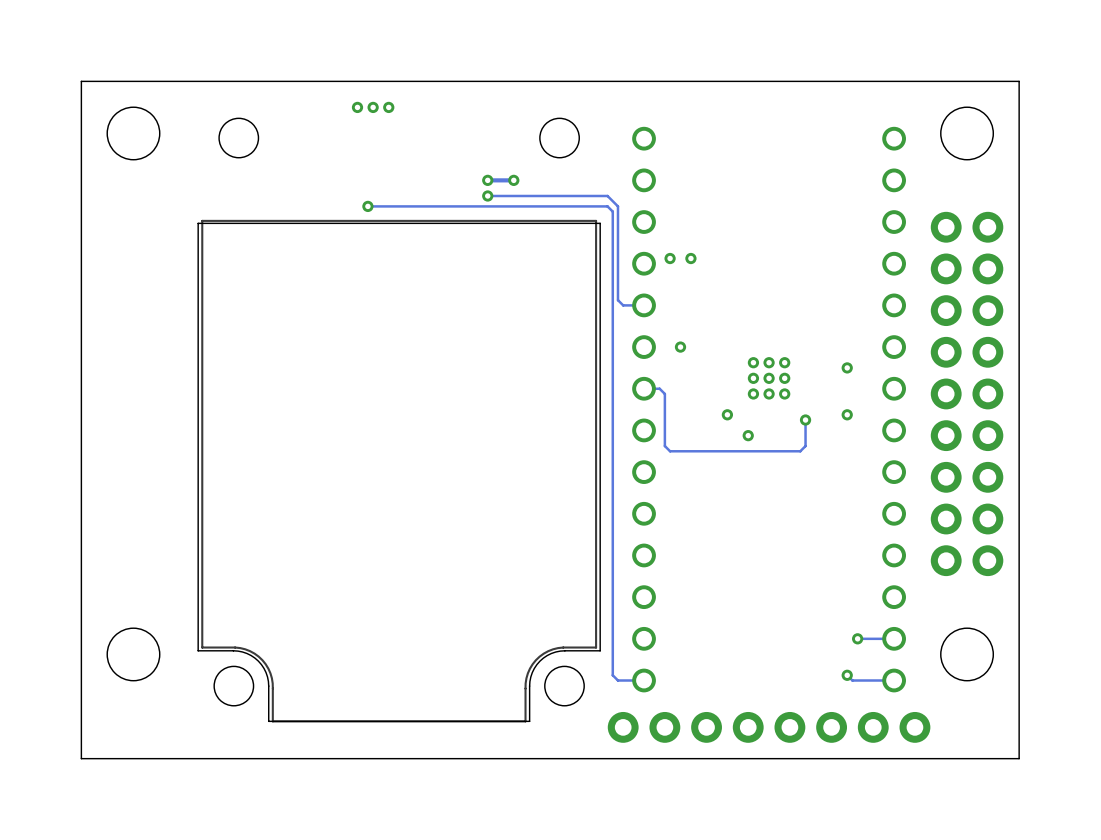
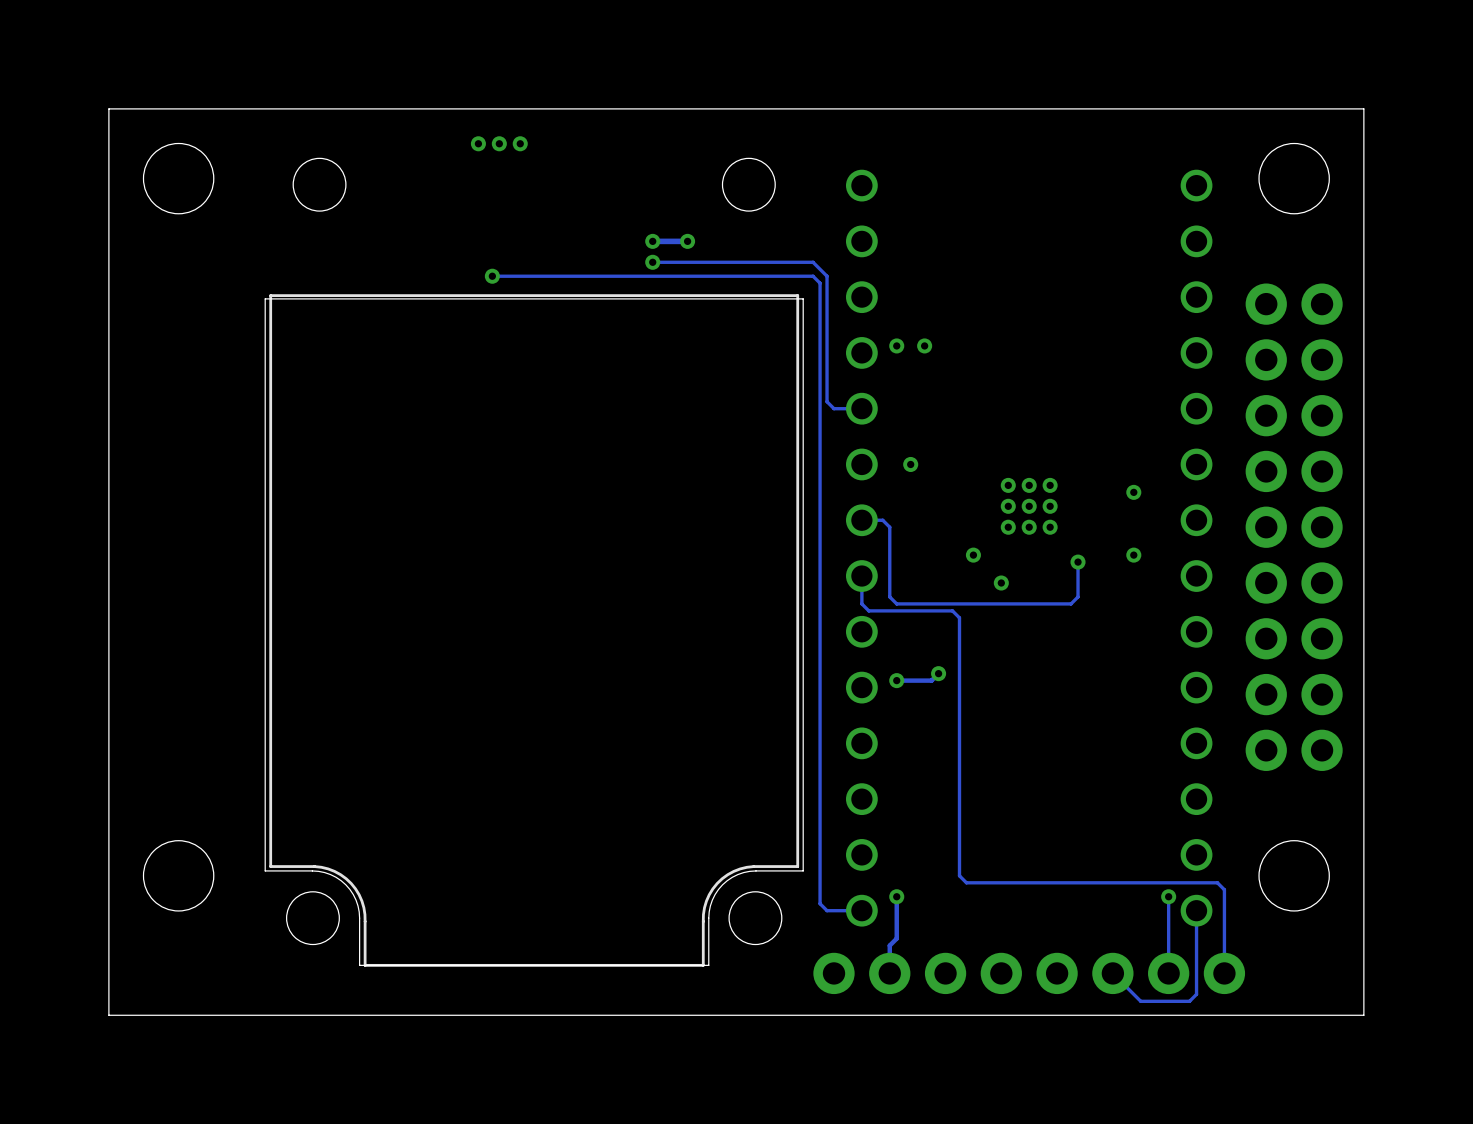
track: none -> (861, 576) (861, 603) (868, 610) (952, 610) (959, 617) (959, 875) (966, 882) (1217, 882) (1224, 889) (1224, 973)
track: none -> (938, 673) (931, 680) (896, 680)
via: none -> (938, 673)
via: none -> (896, 680)
via: (857, 638) -> none
track: (894, 638) (857, 638) -> none
track: none -> (896, 896) (896, 938) (889, 945) (889, 973)
via: none -> (896, 896)
track: none -> (1168, 896) (1168, 973)
via: none -> (1168, 896)
track: (847, 675) (852, 680) (894, 680) -> (1112, 973) (1140, 1001) (1189, 1001) (1196, 994) (1196, 910)
via: (847, 675) -> none

